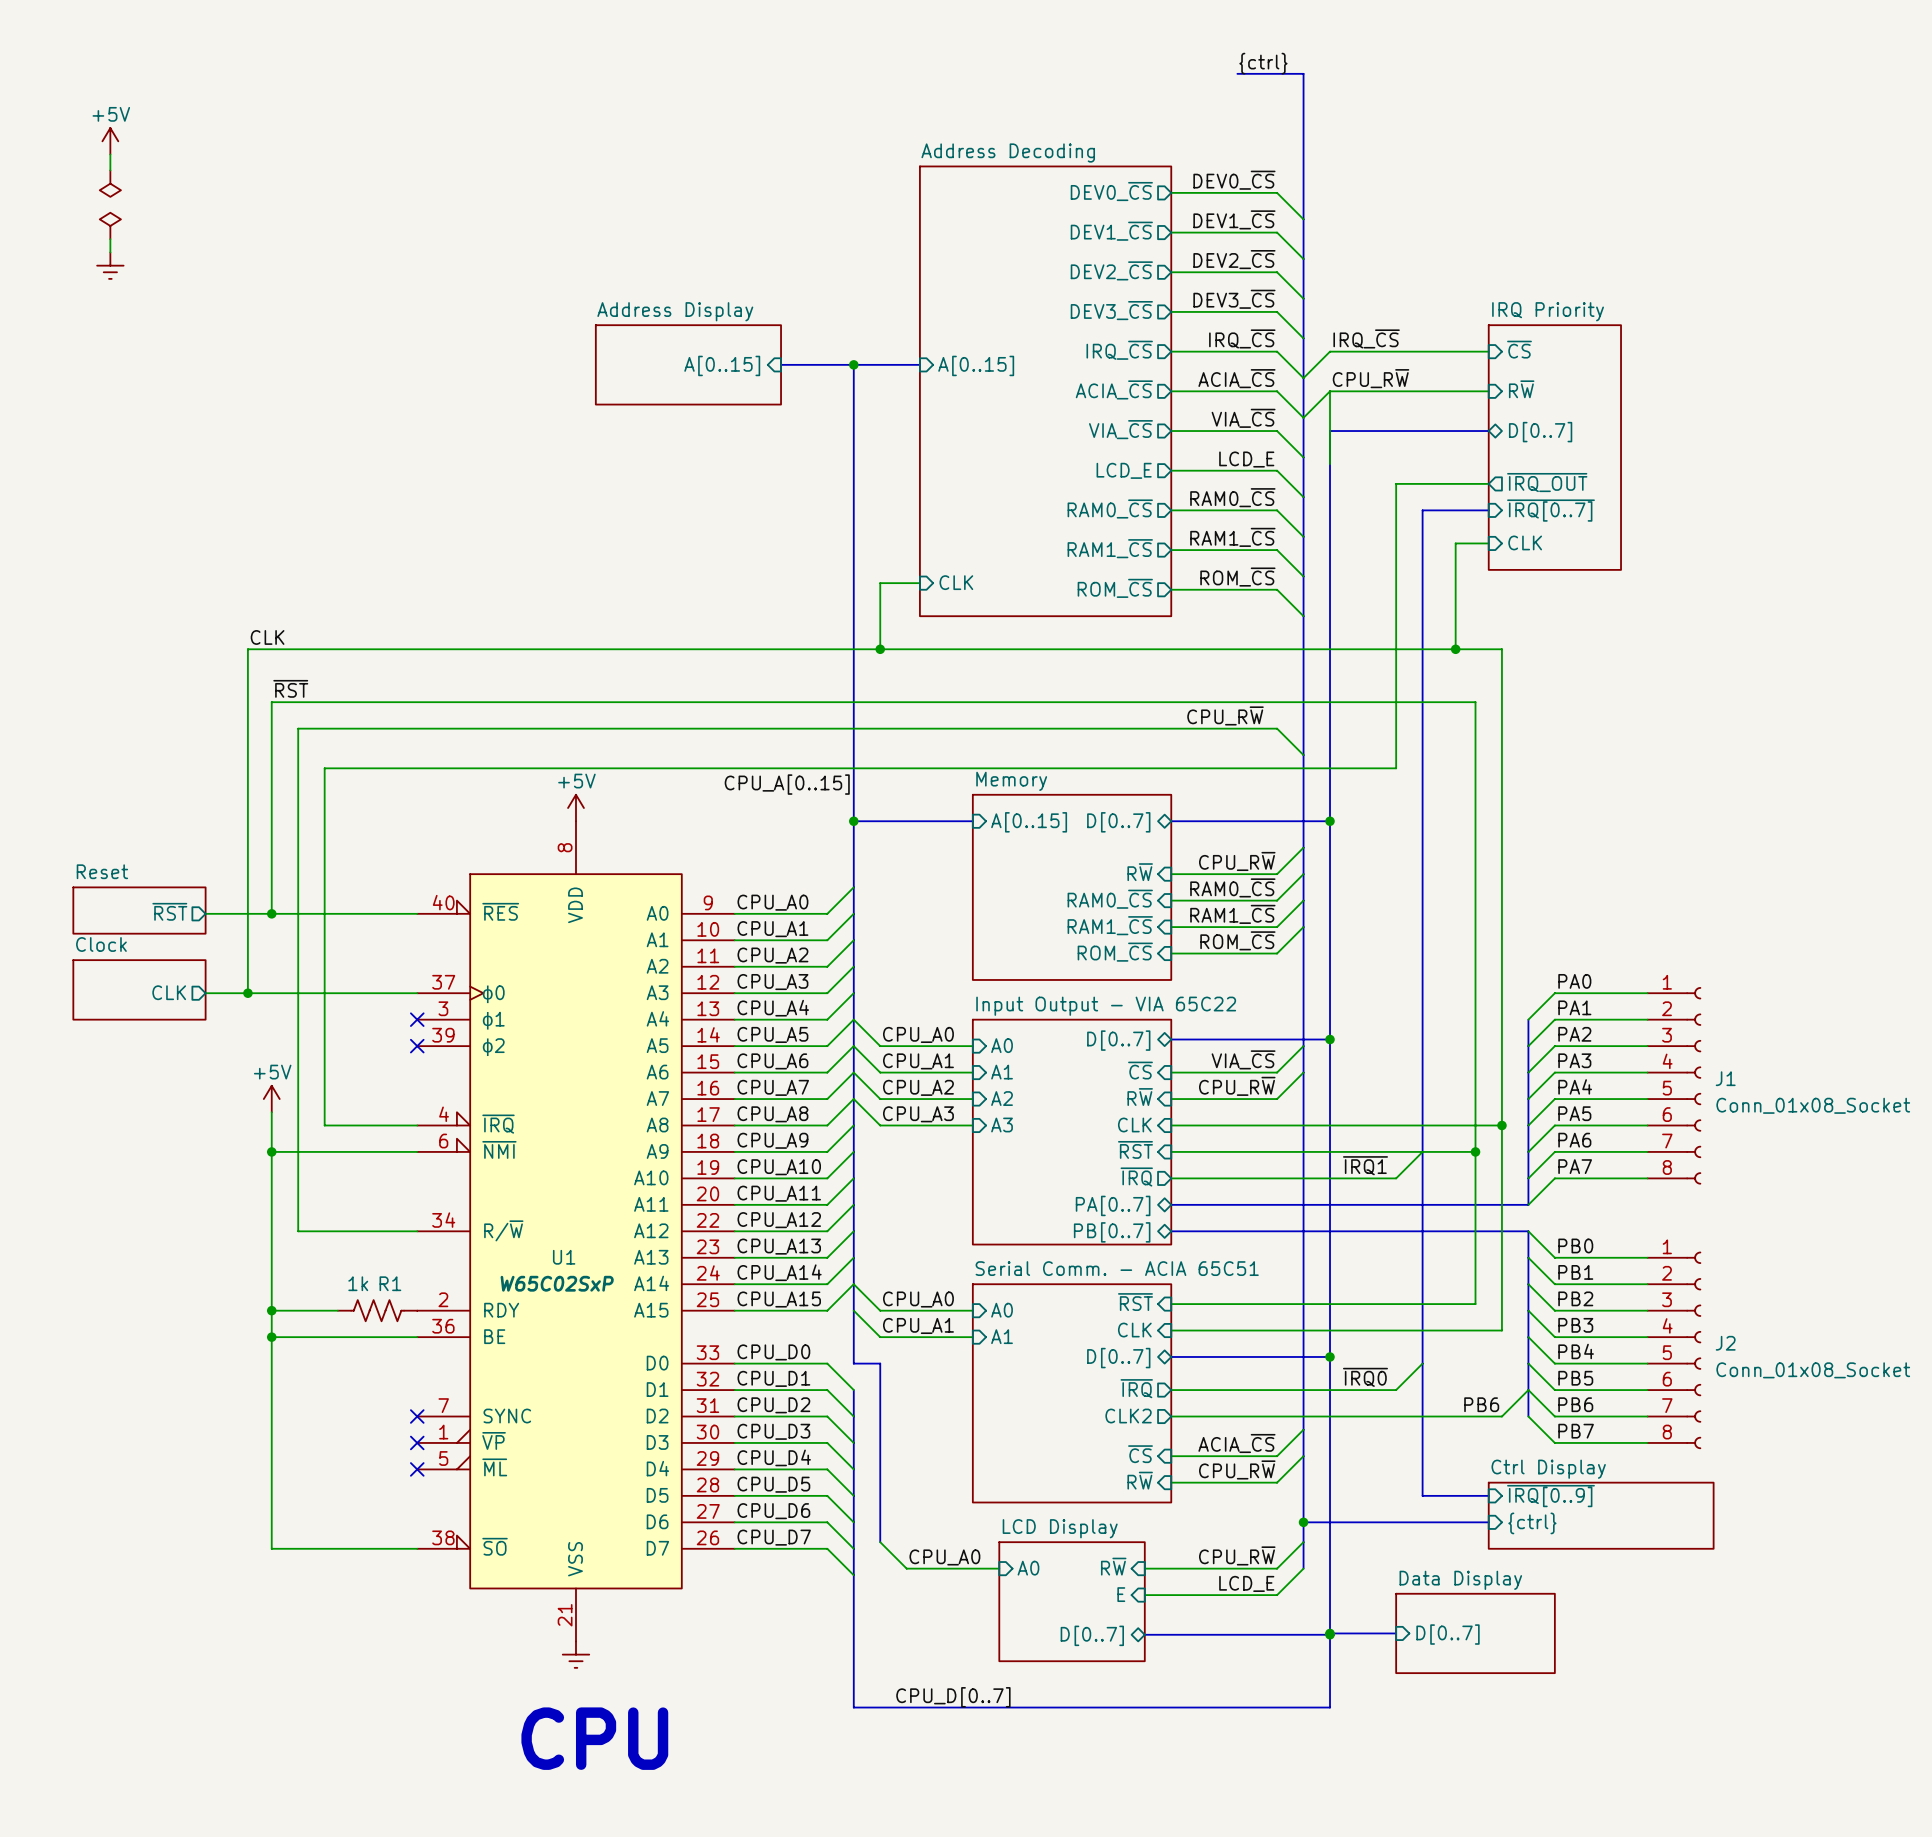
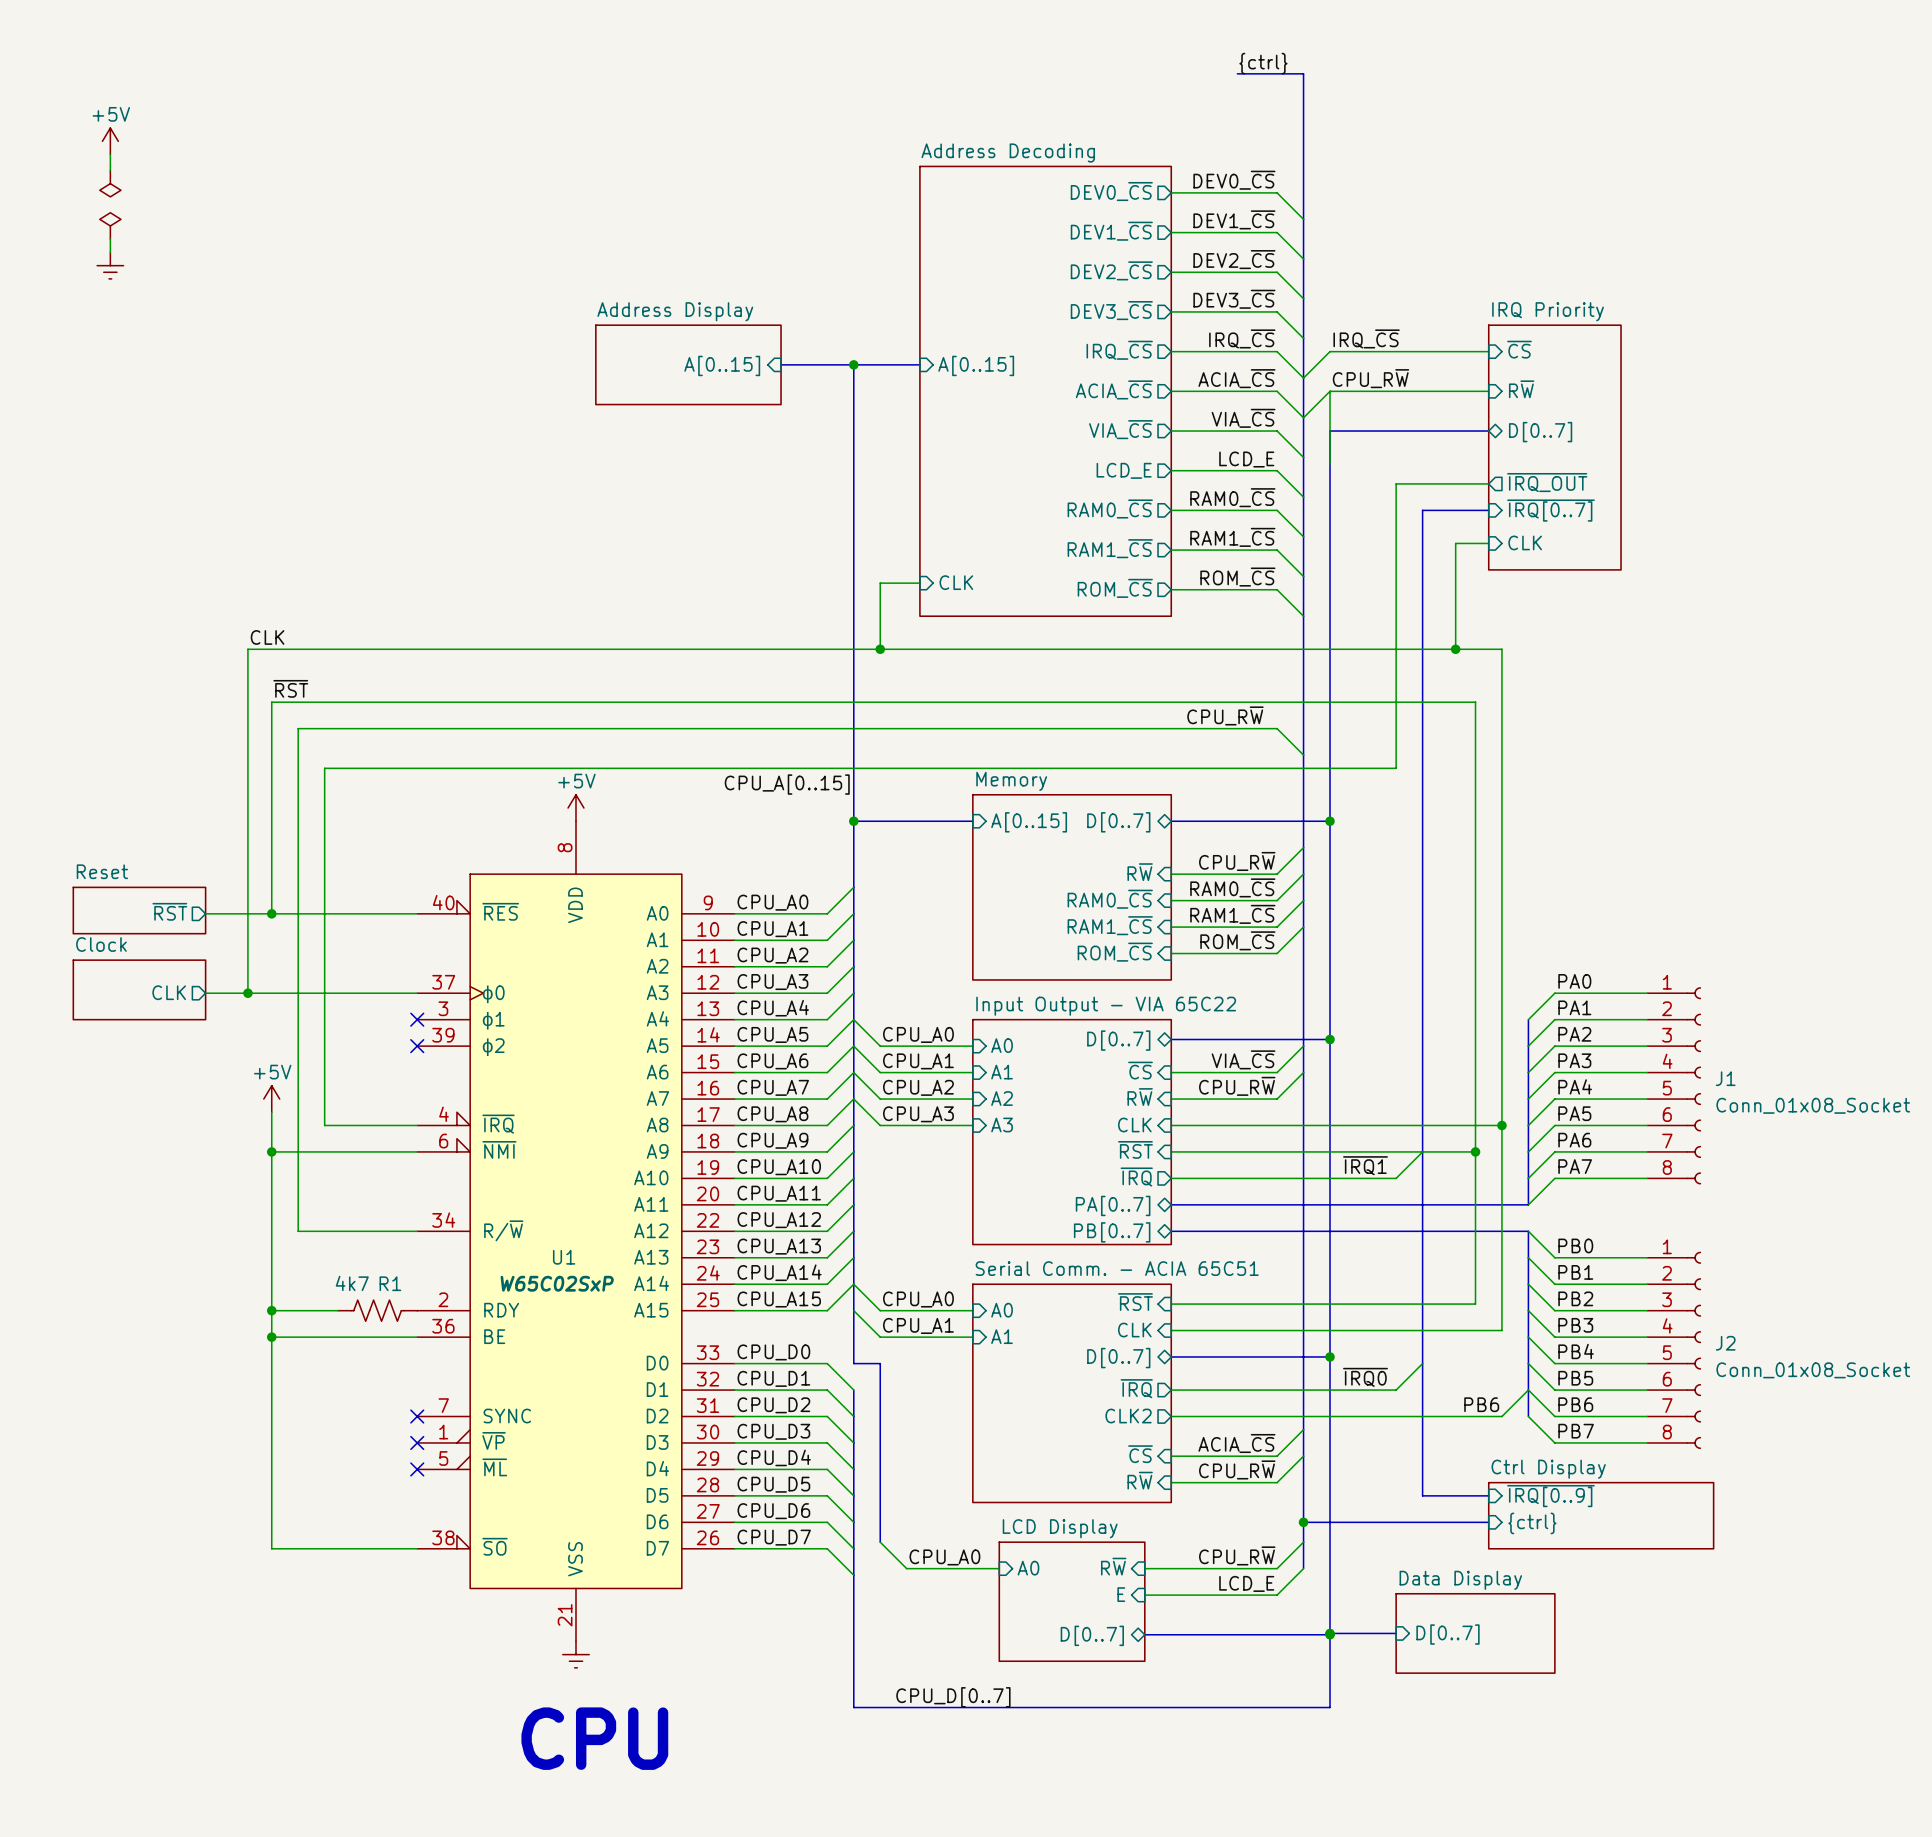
R1 value: 1k (358, 1283) -> 4k7 (352, 1283)

